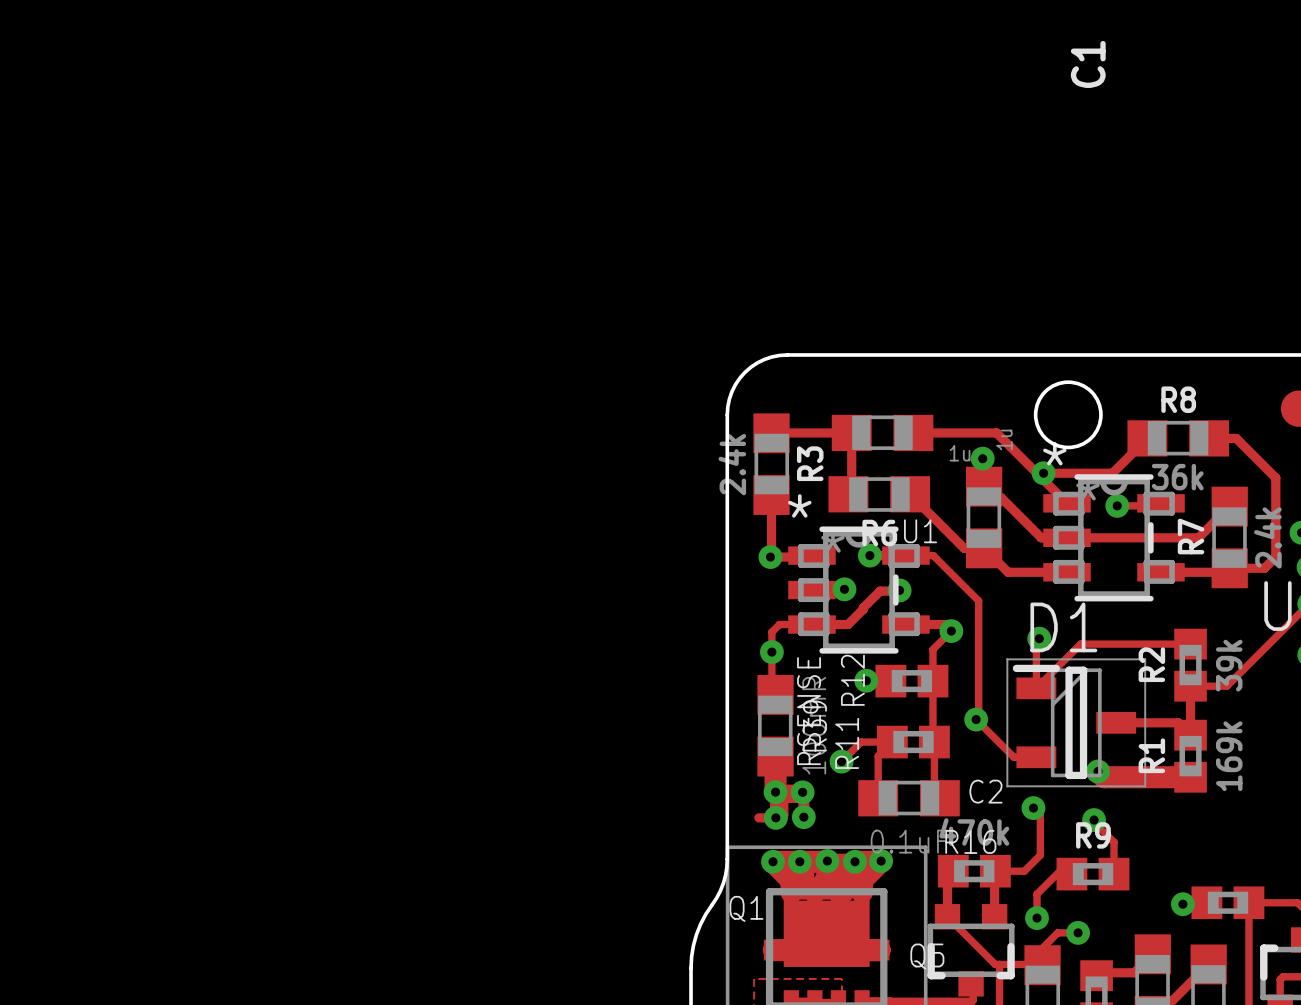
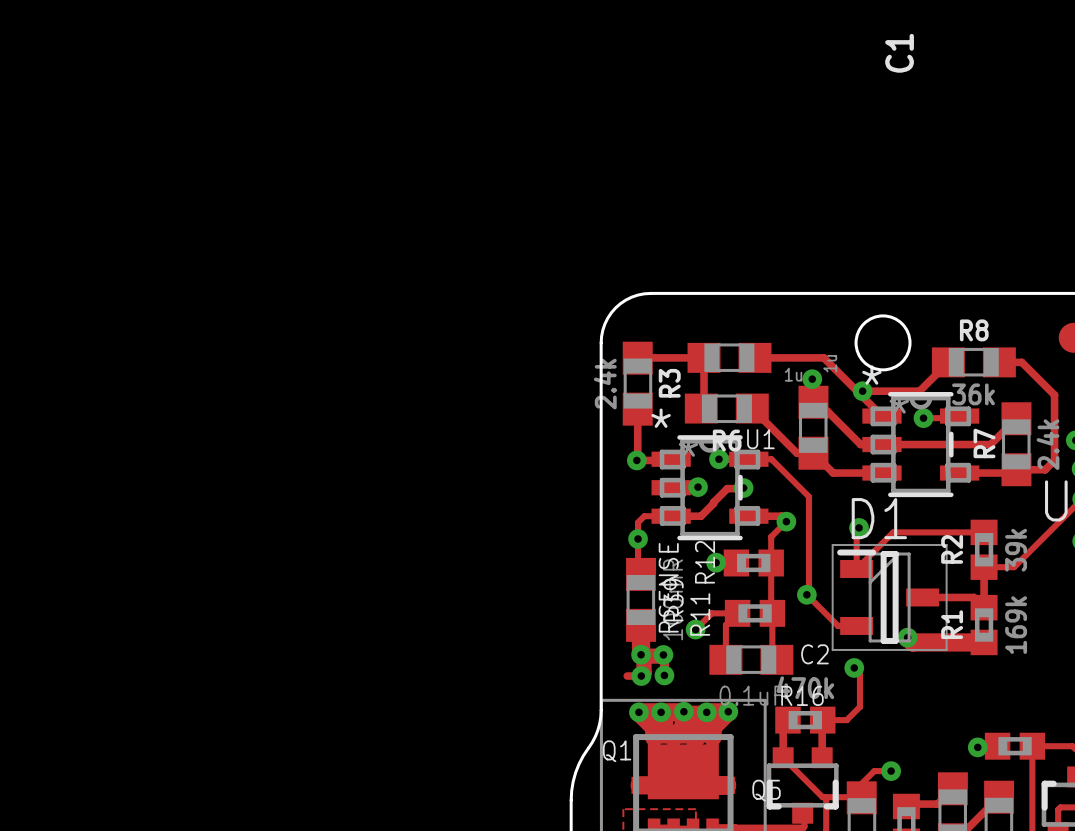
track: (1094, 820) (1114, 842) (1114, 874) -> none
via: (1094, 820) -> none
track: (1071, 874) (1068, 870) (1060, 870) (1037, 894) (1037, 918) -> none
R9: (1092, 874) -> none
via: (1037, 918) -> none

